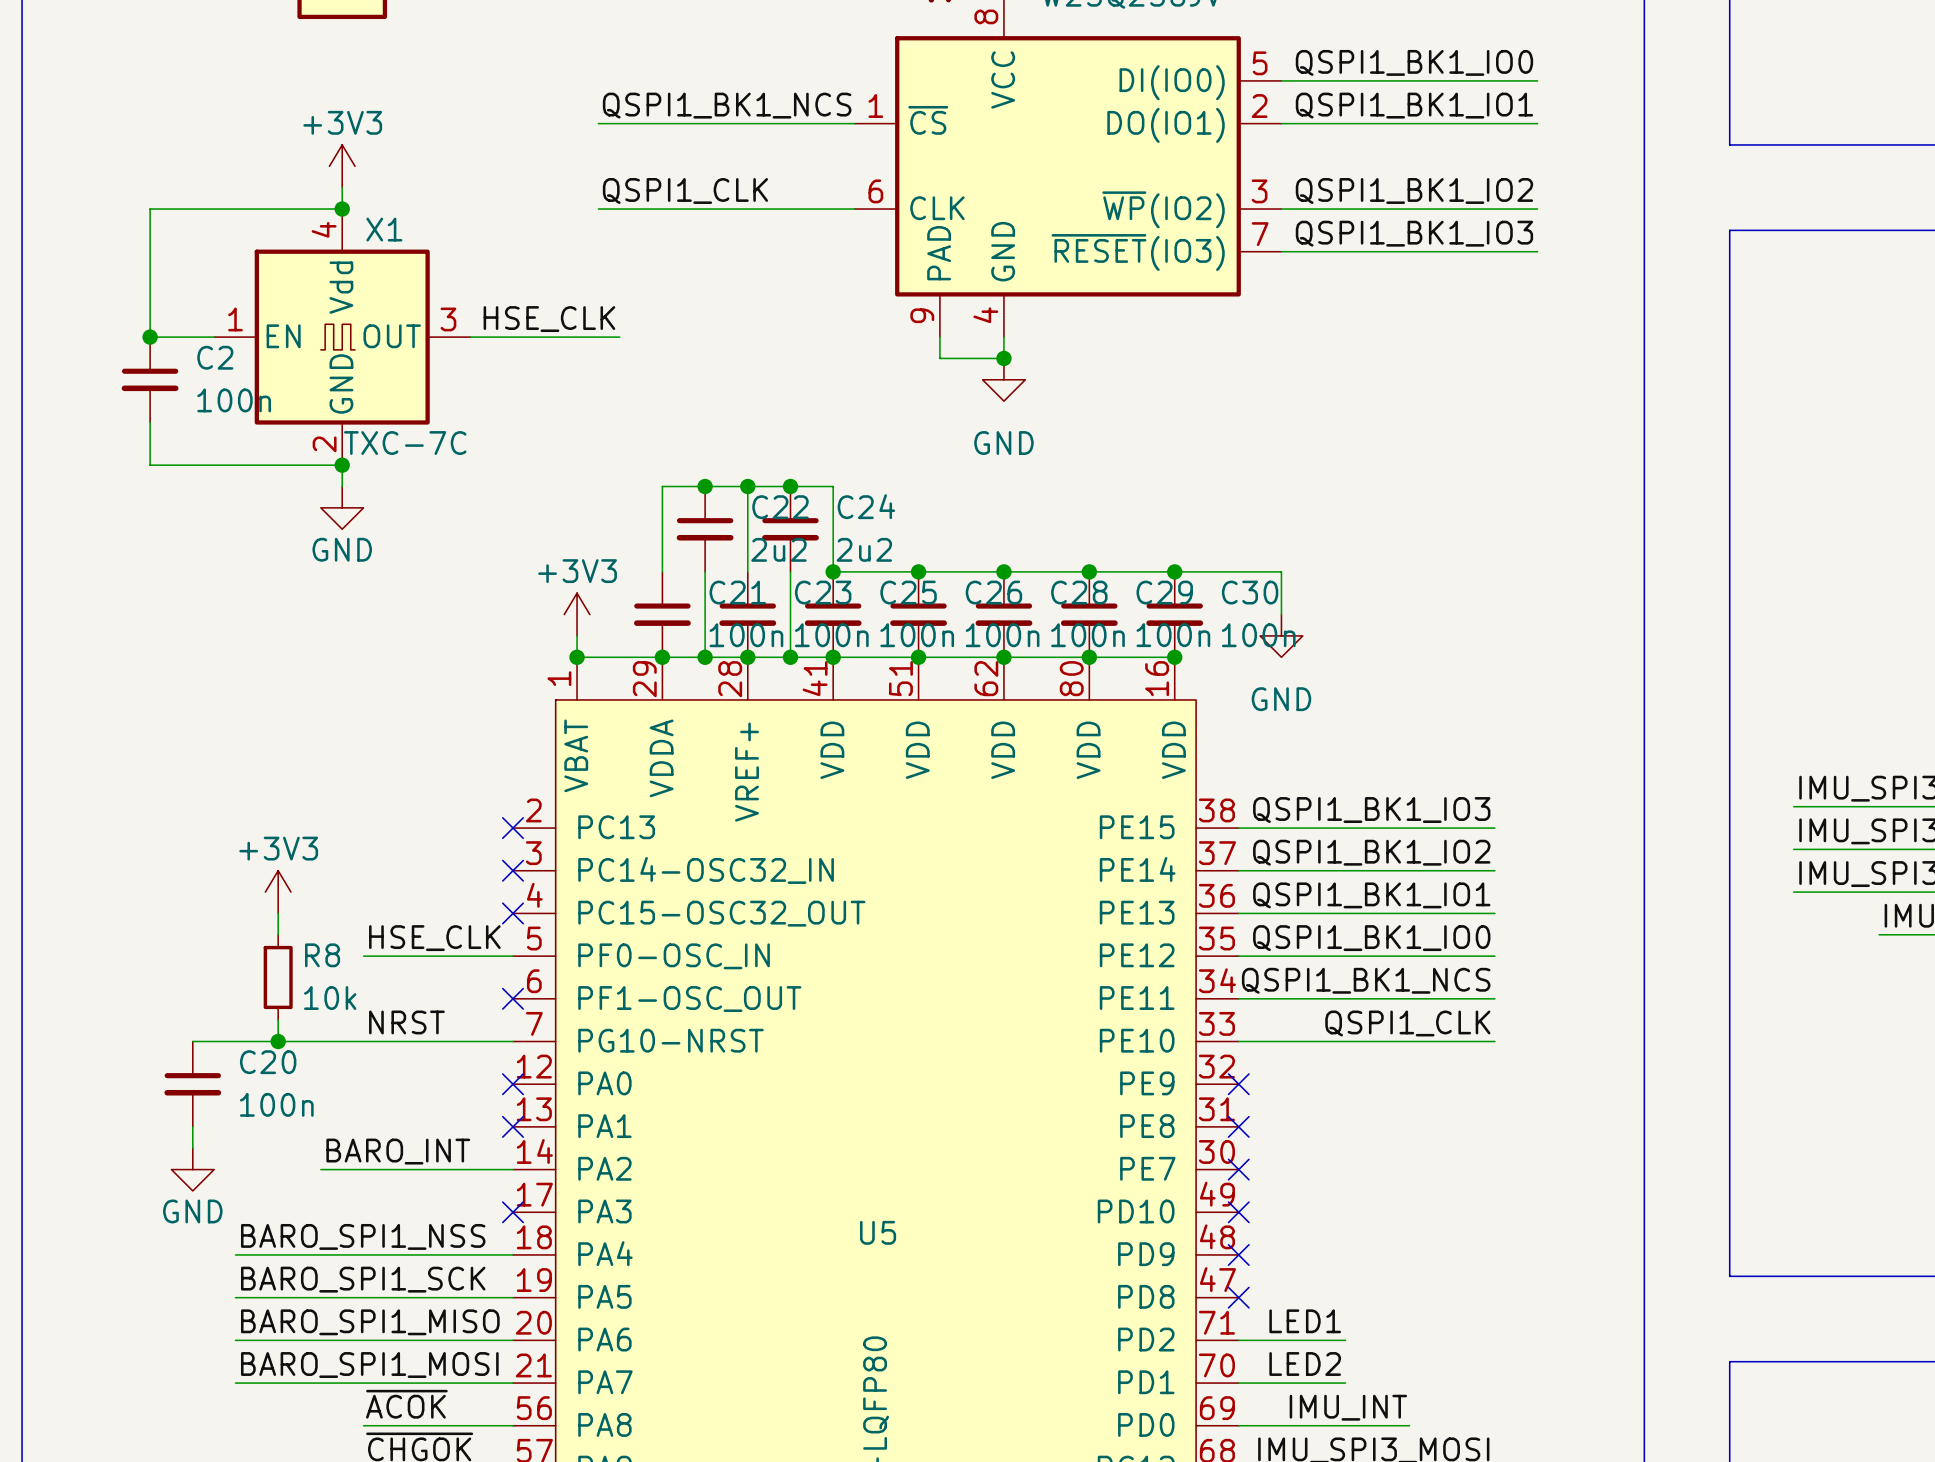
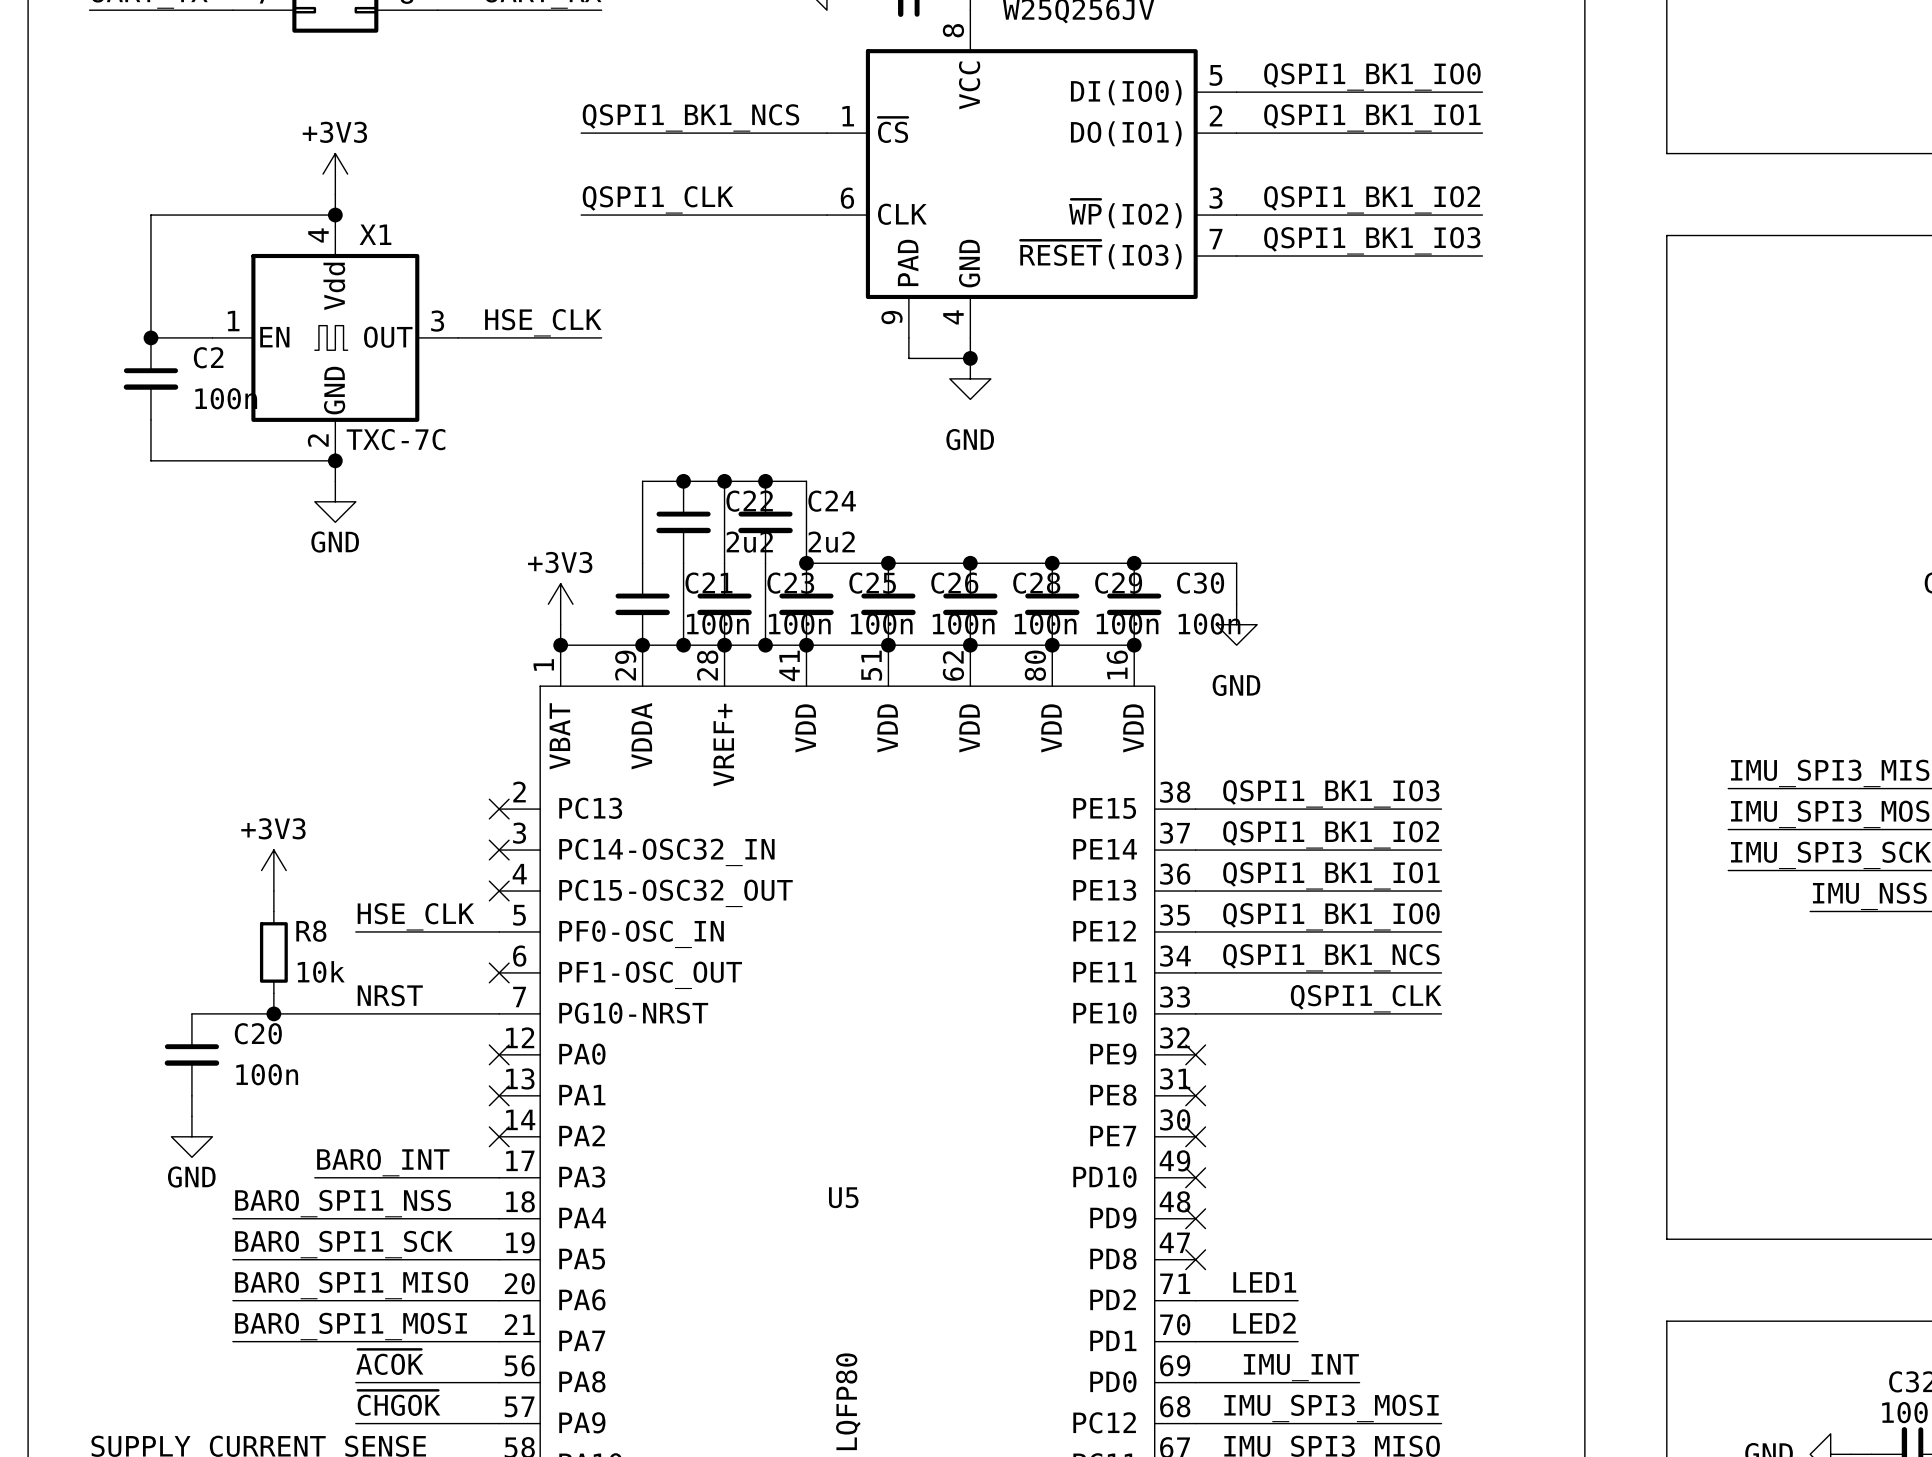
label position: BARO_INT (398, 1151) -> BARO_INT (383, 1162)
wire: (320, 1169) (512, 1169) -> (314, 1177) (499, 1177)
no-connect mark position: (512, 1212) -> (499, 1136)

